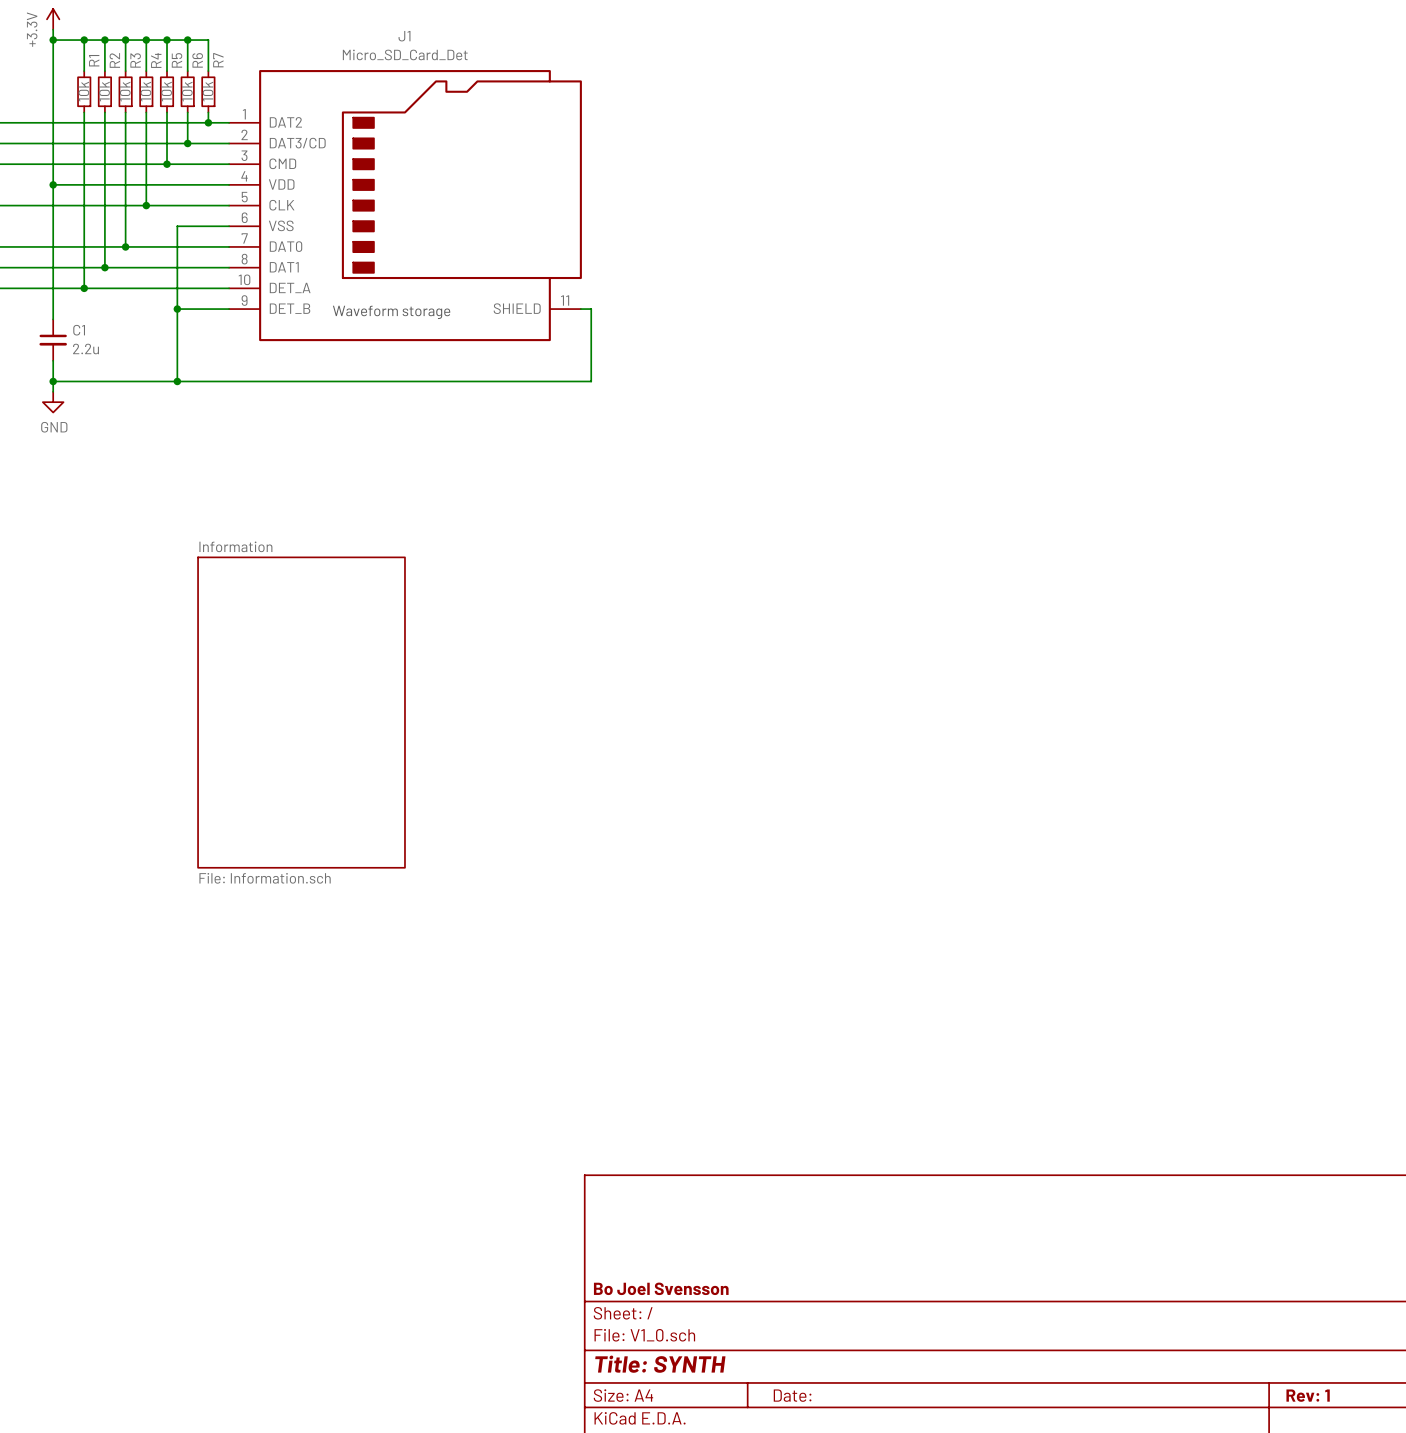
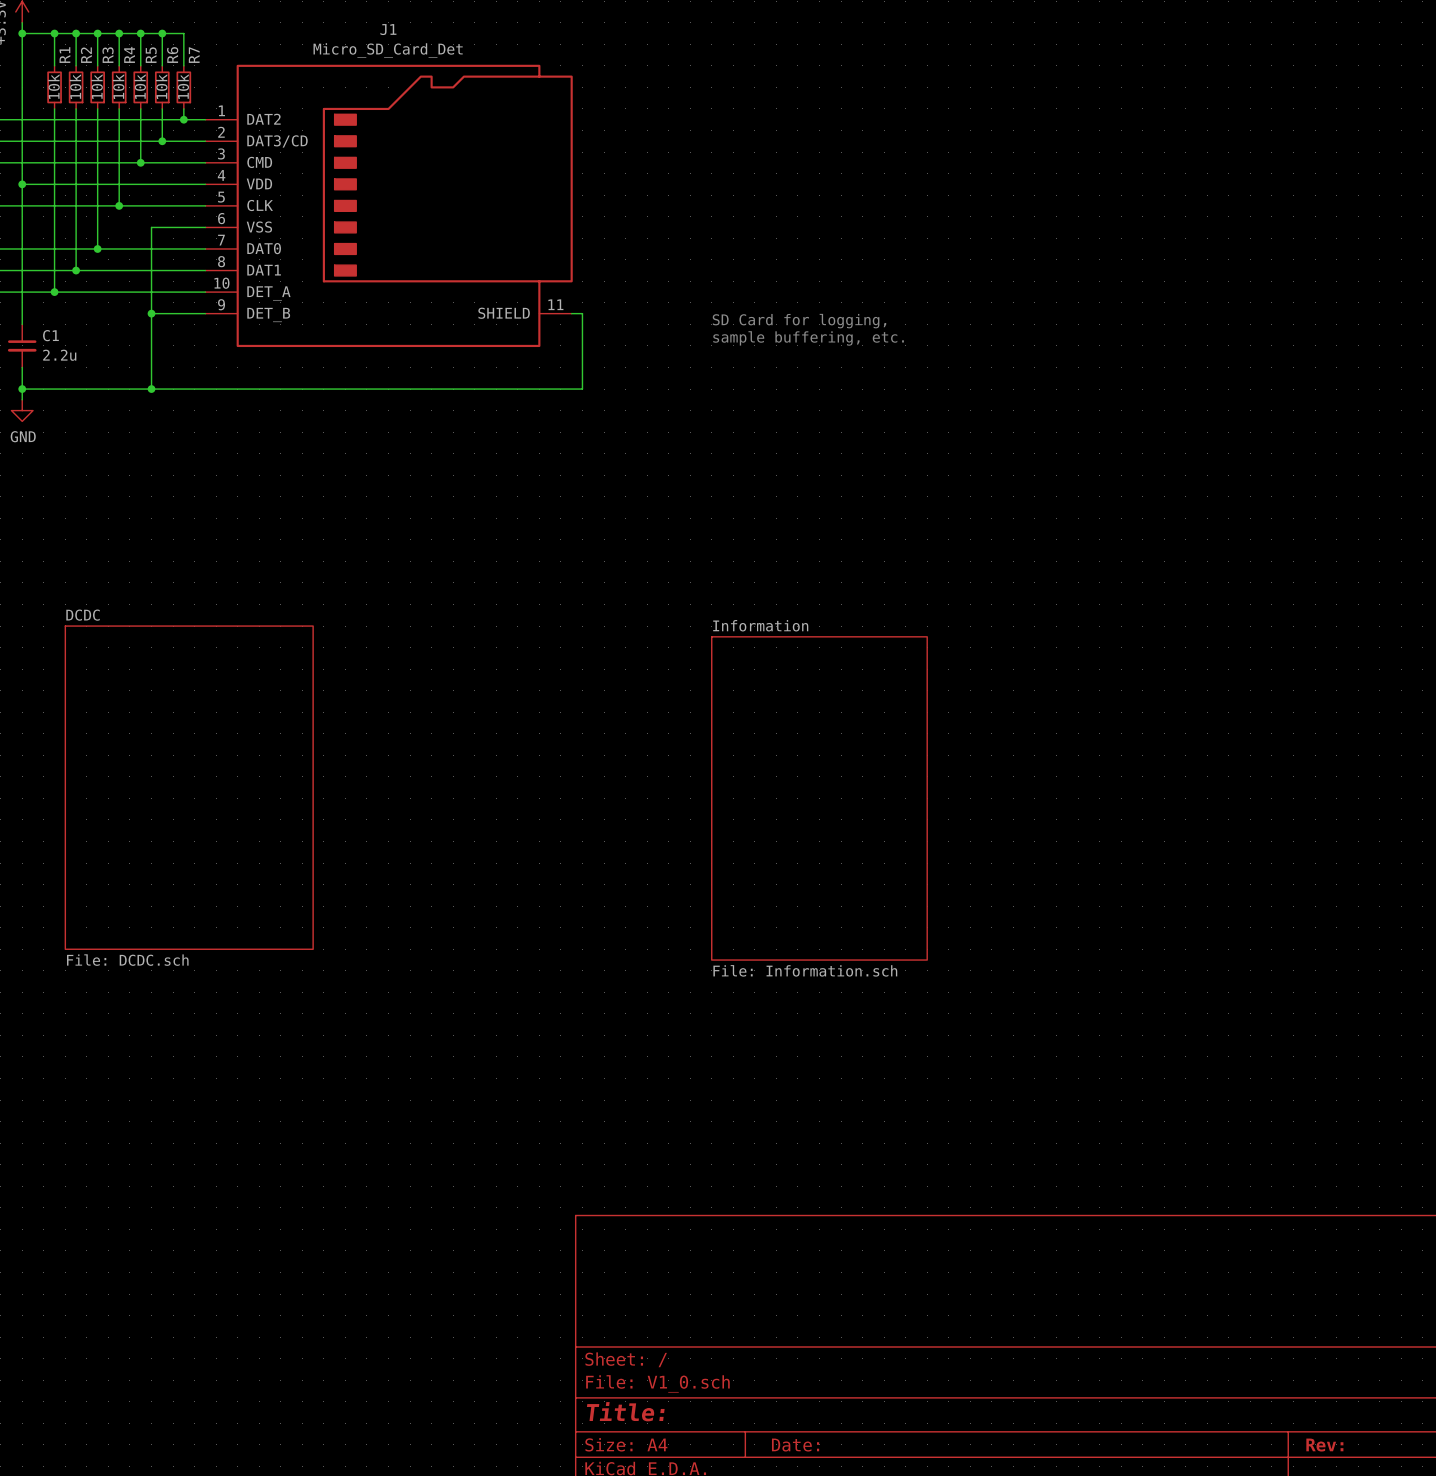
text: Waveform storage (391, 312) -> none
text: none -> SD Card for logging, (799, 321)
text: none -> sample buffering, etc. (808, 338)
sheet Information: File: Information.sch (301, 712) -> none
sheet DCDC: none -> File: DCDC.sch (189, 787)
sheet Information: none -> File: Information.sch (819, 798)
title block: Bo Joel Svensson (661, 1288) -> none
title block: Title: SYNTH (660, 1364) -> Title: (625, 1411)
title block: Rev: 1 (1308, 1395) -> Rev: (1324, 1445)

